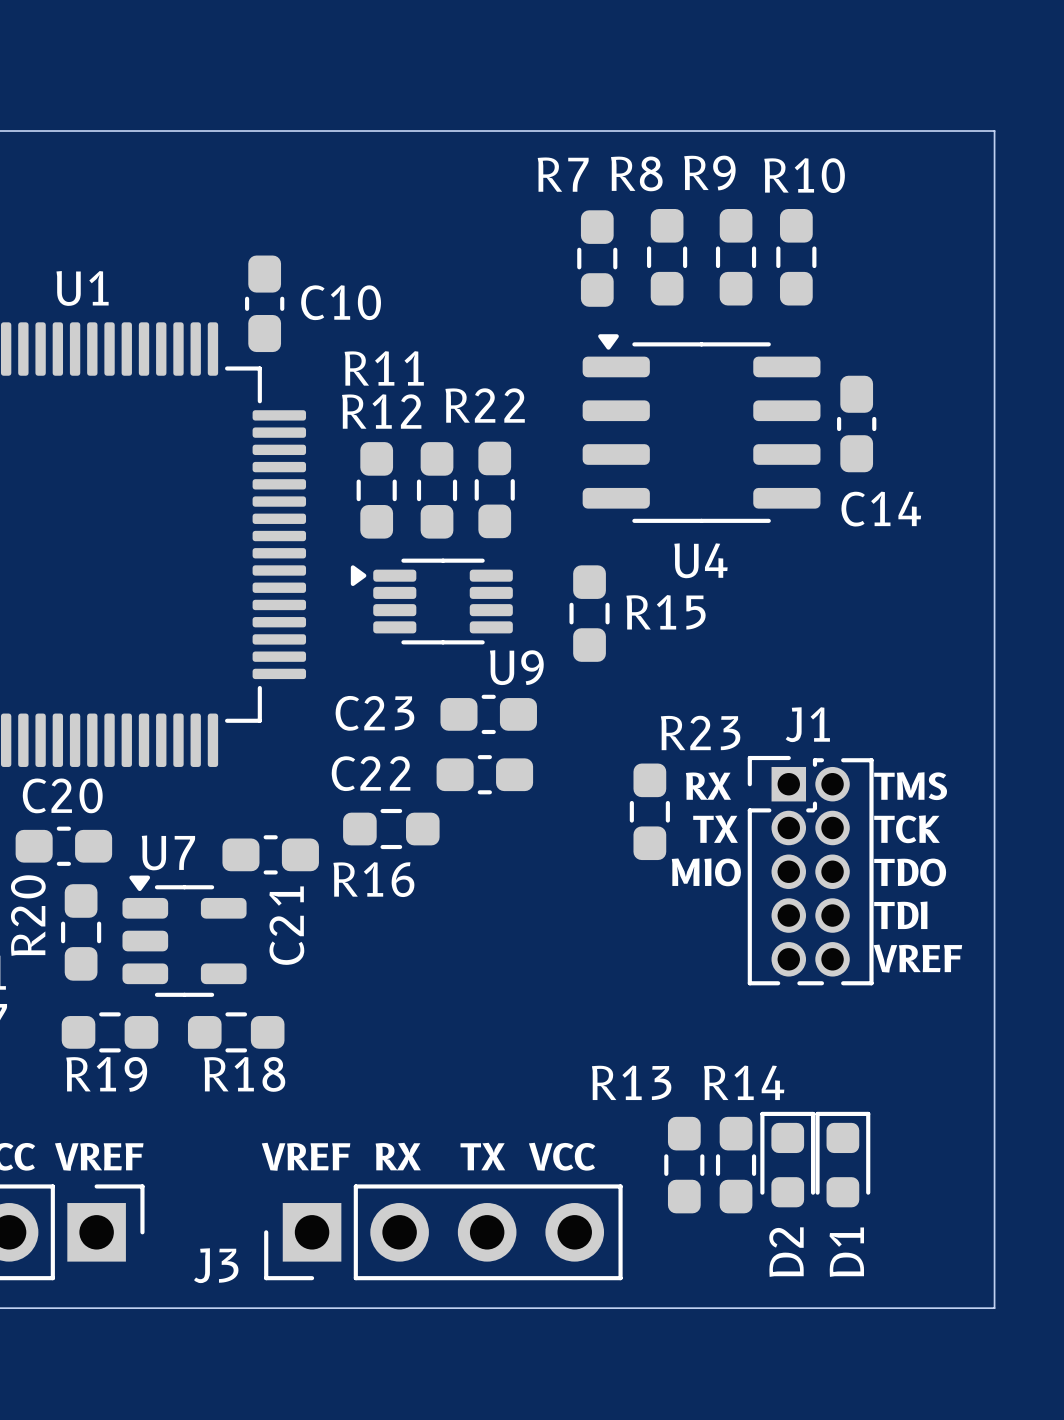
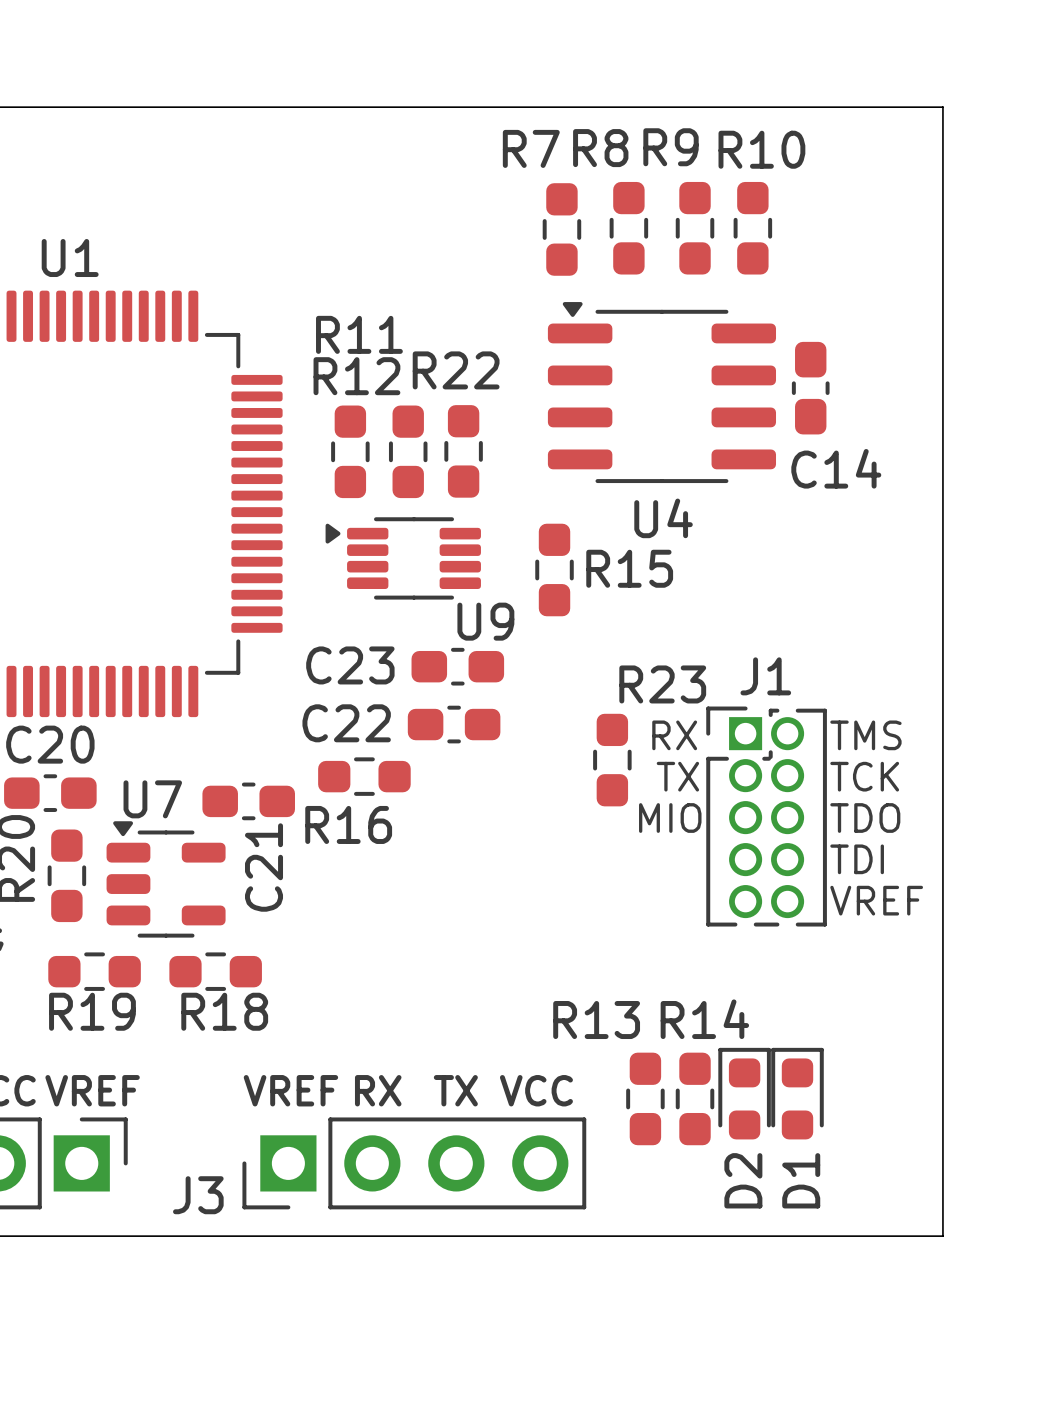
C10: (264, 303) -> none

